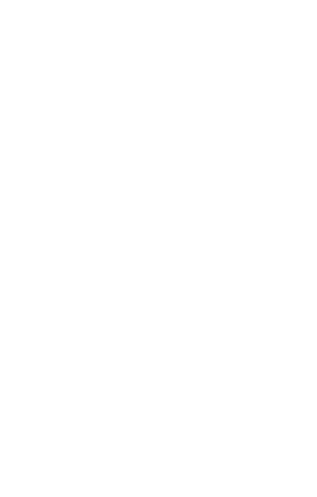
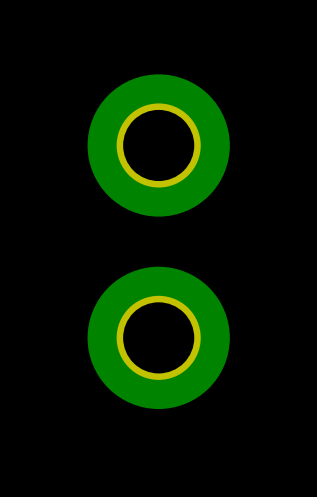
part: none -> (158, 145)
part: none -> (158, 337)

